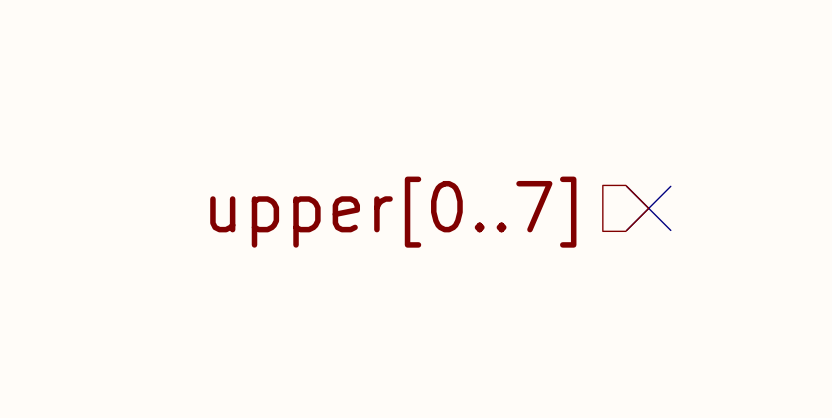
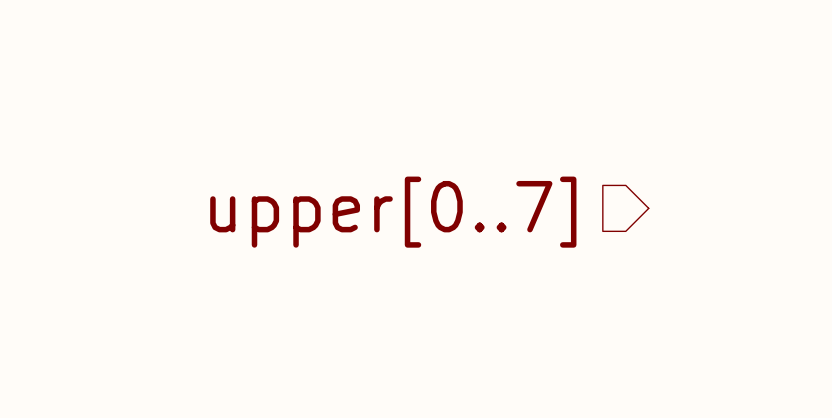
no-connect mark: (648, 208) -> none

